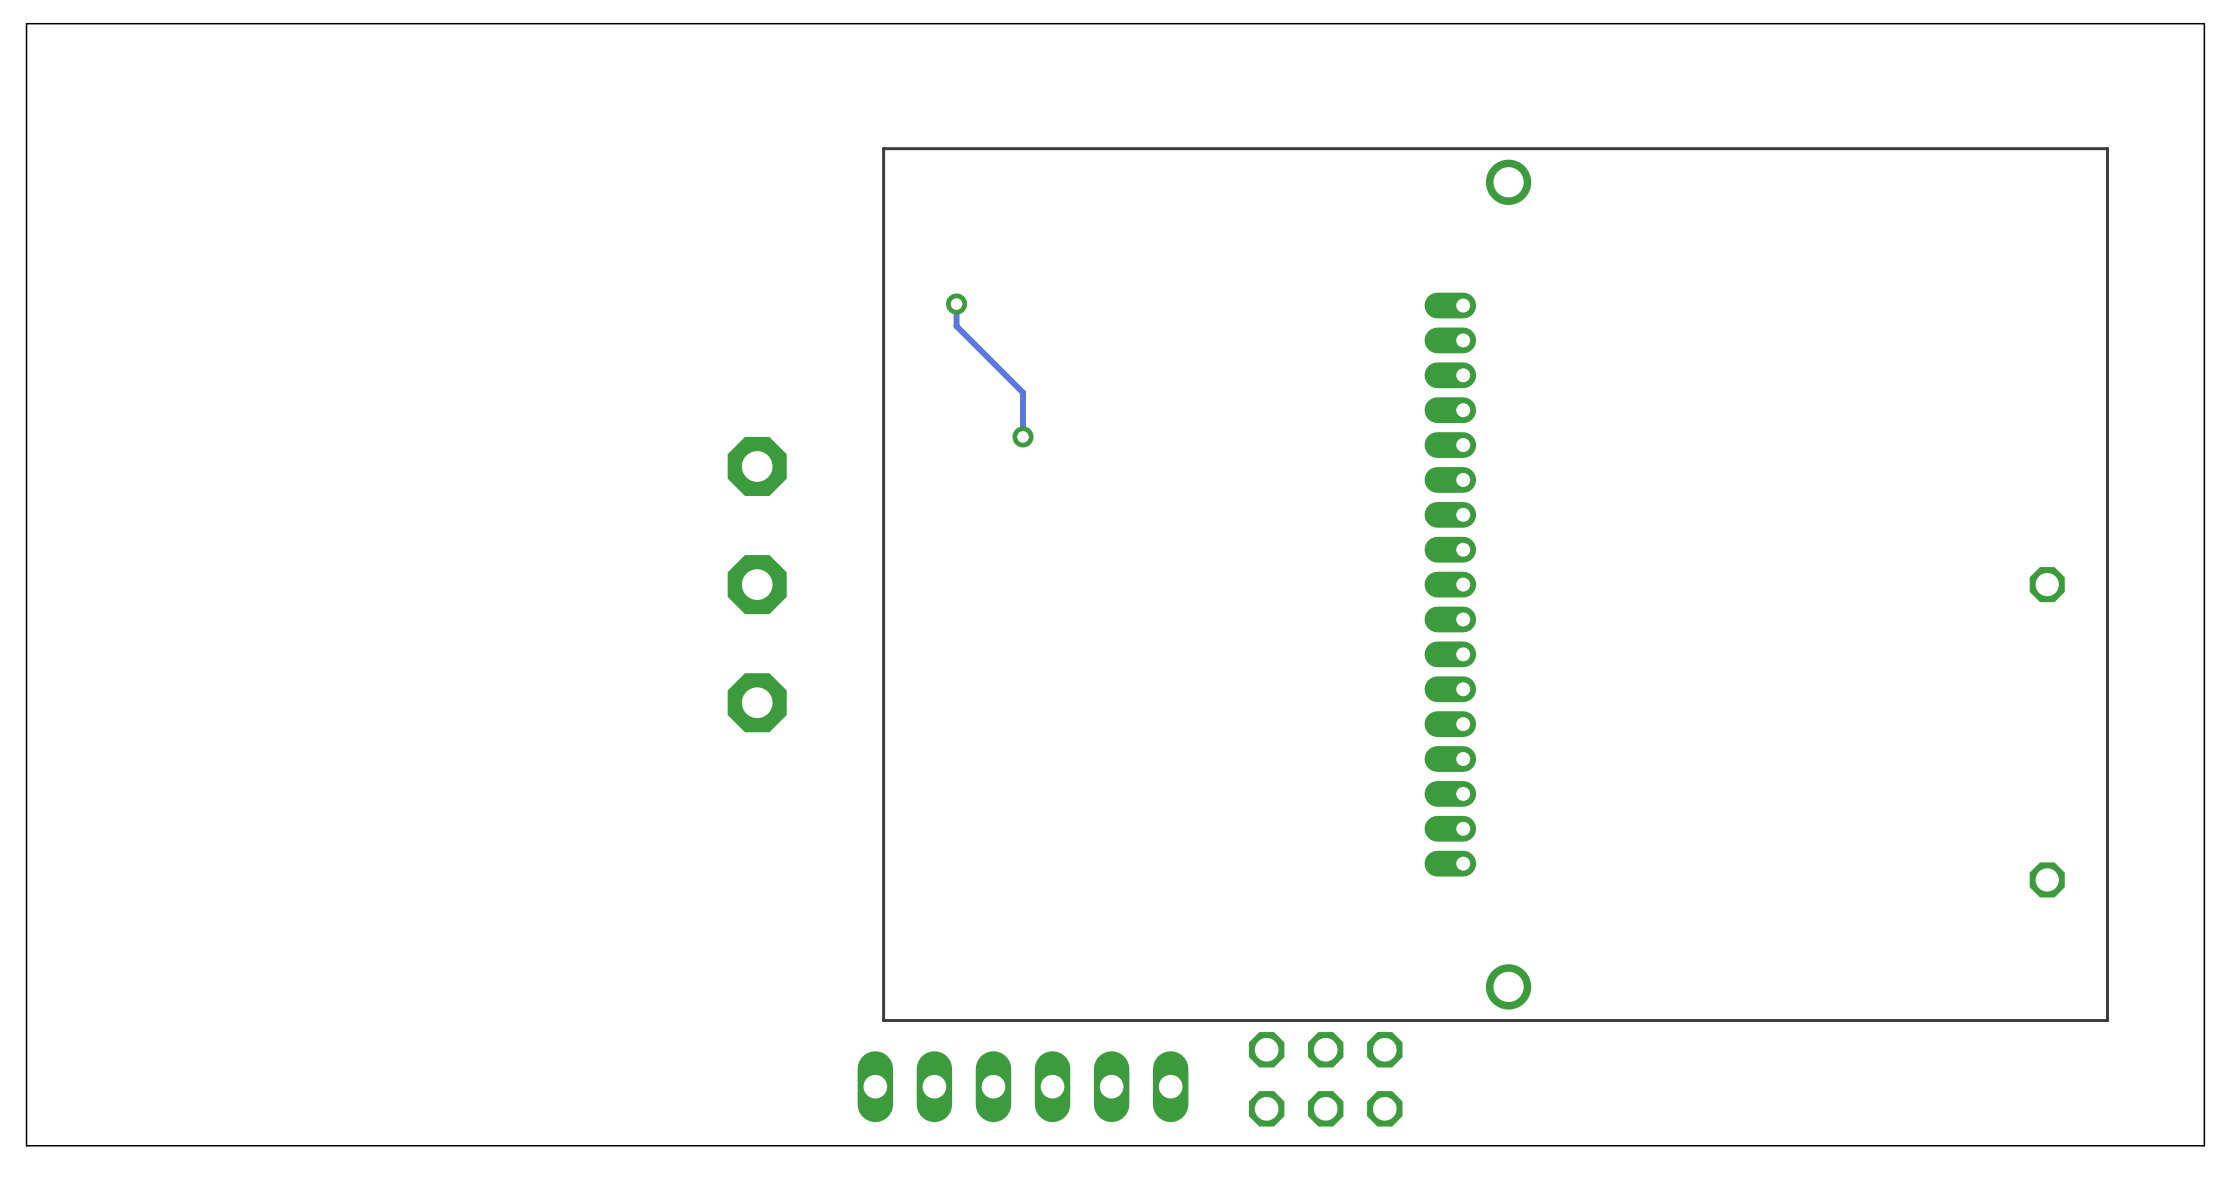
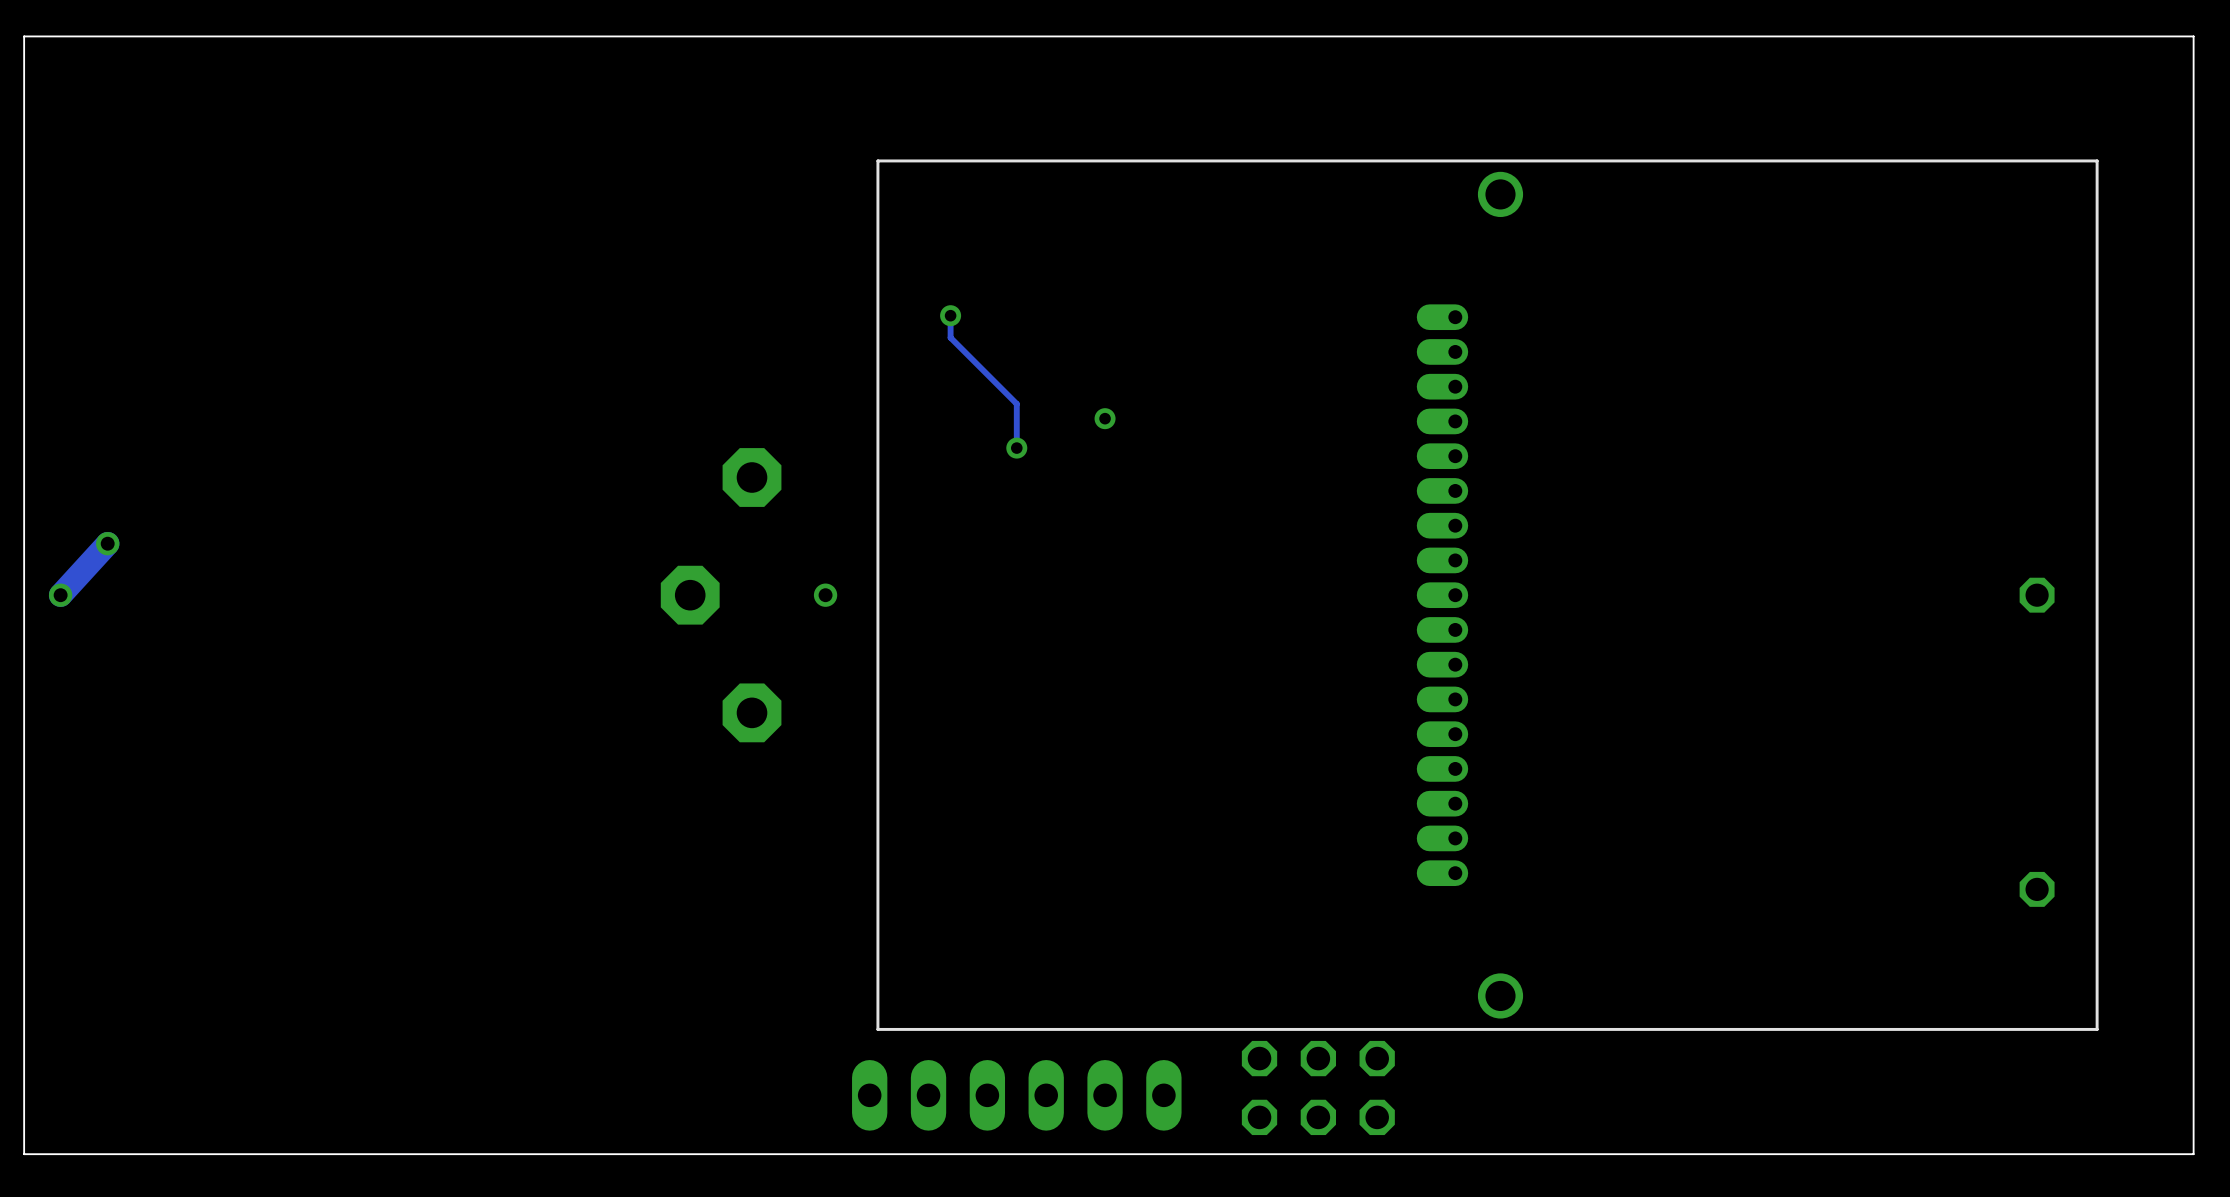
via: none -> (1105, 418)
track: none -> (107, 543) (60, 595)
via: none -> (107, 543)
via: none -> (60, 595)
part position: (757, 584) -> (690, 595)
via: none -> (825, 595)

